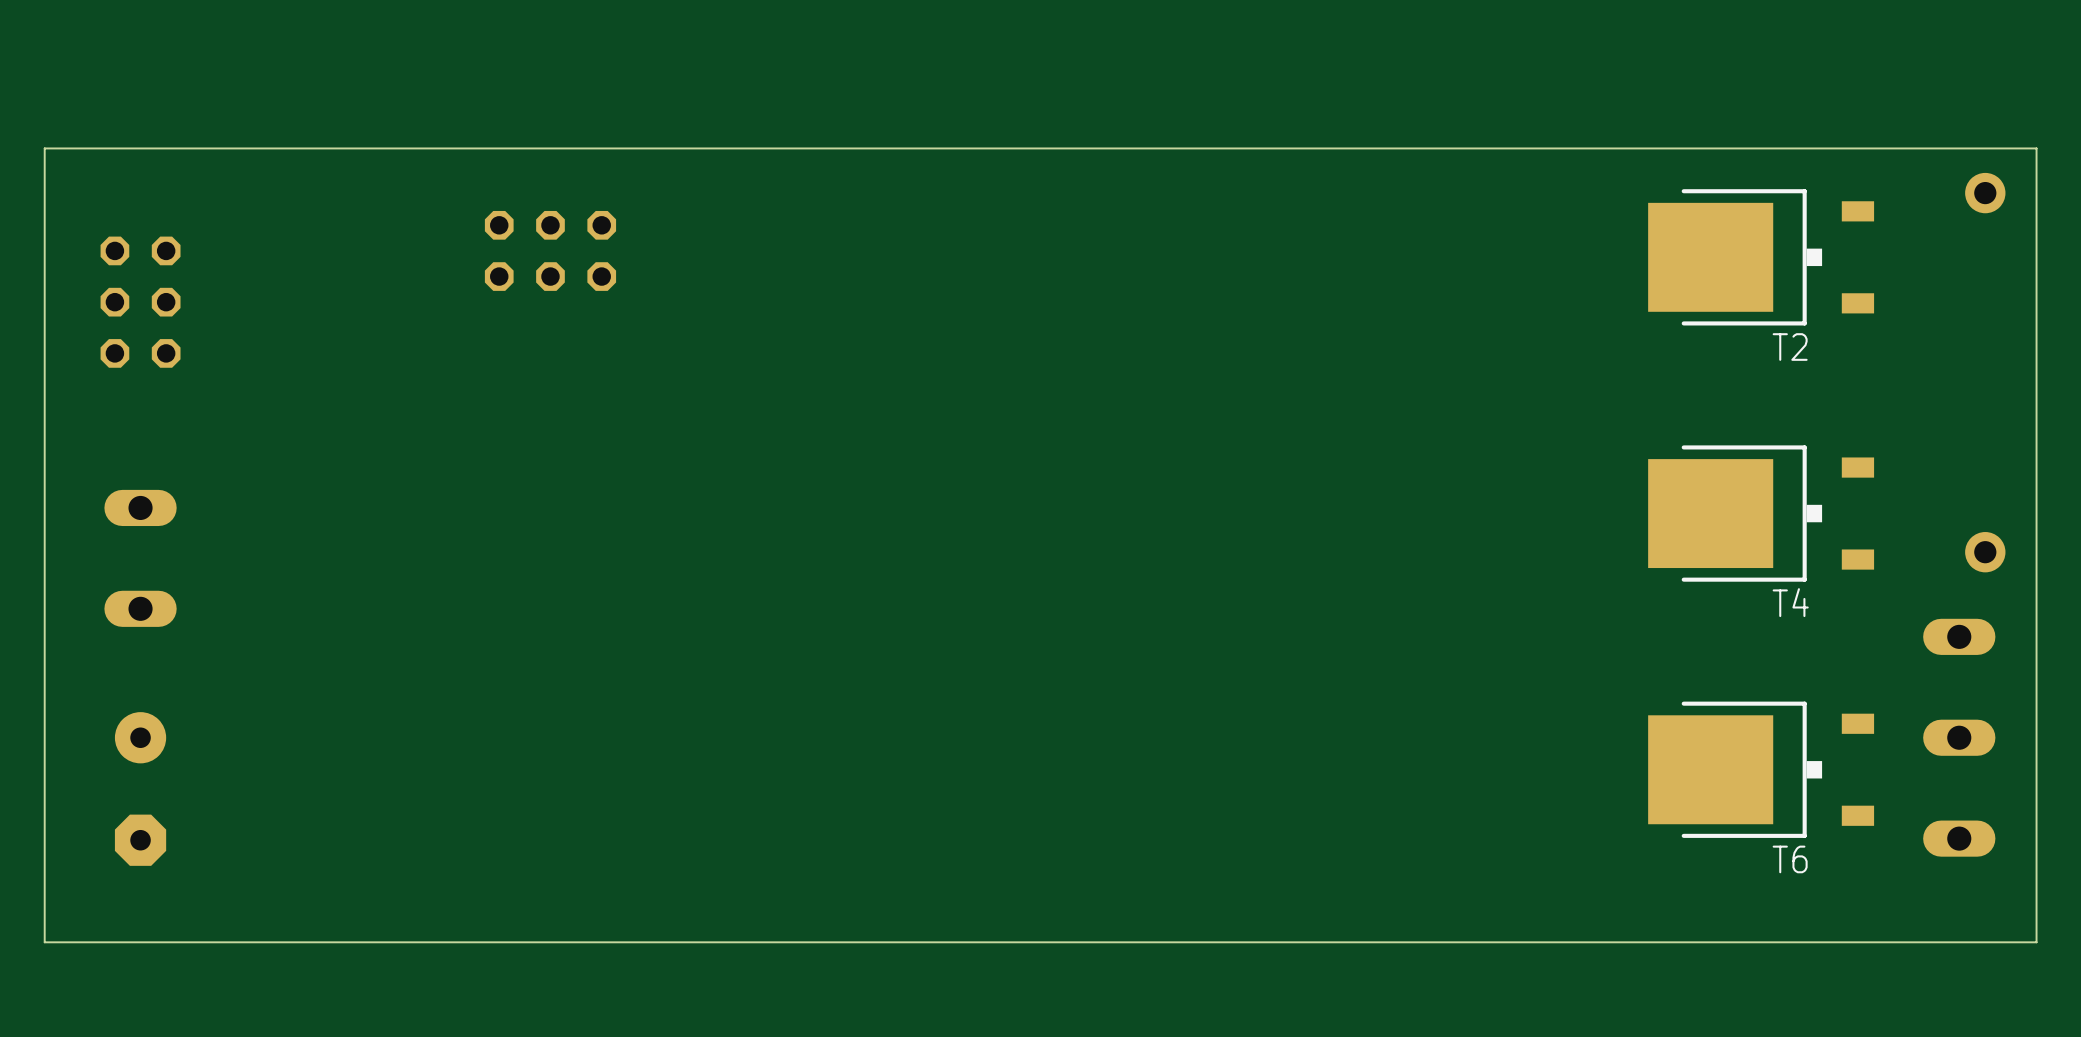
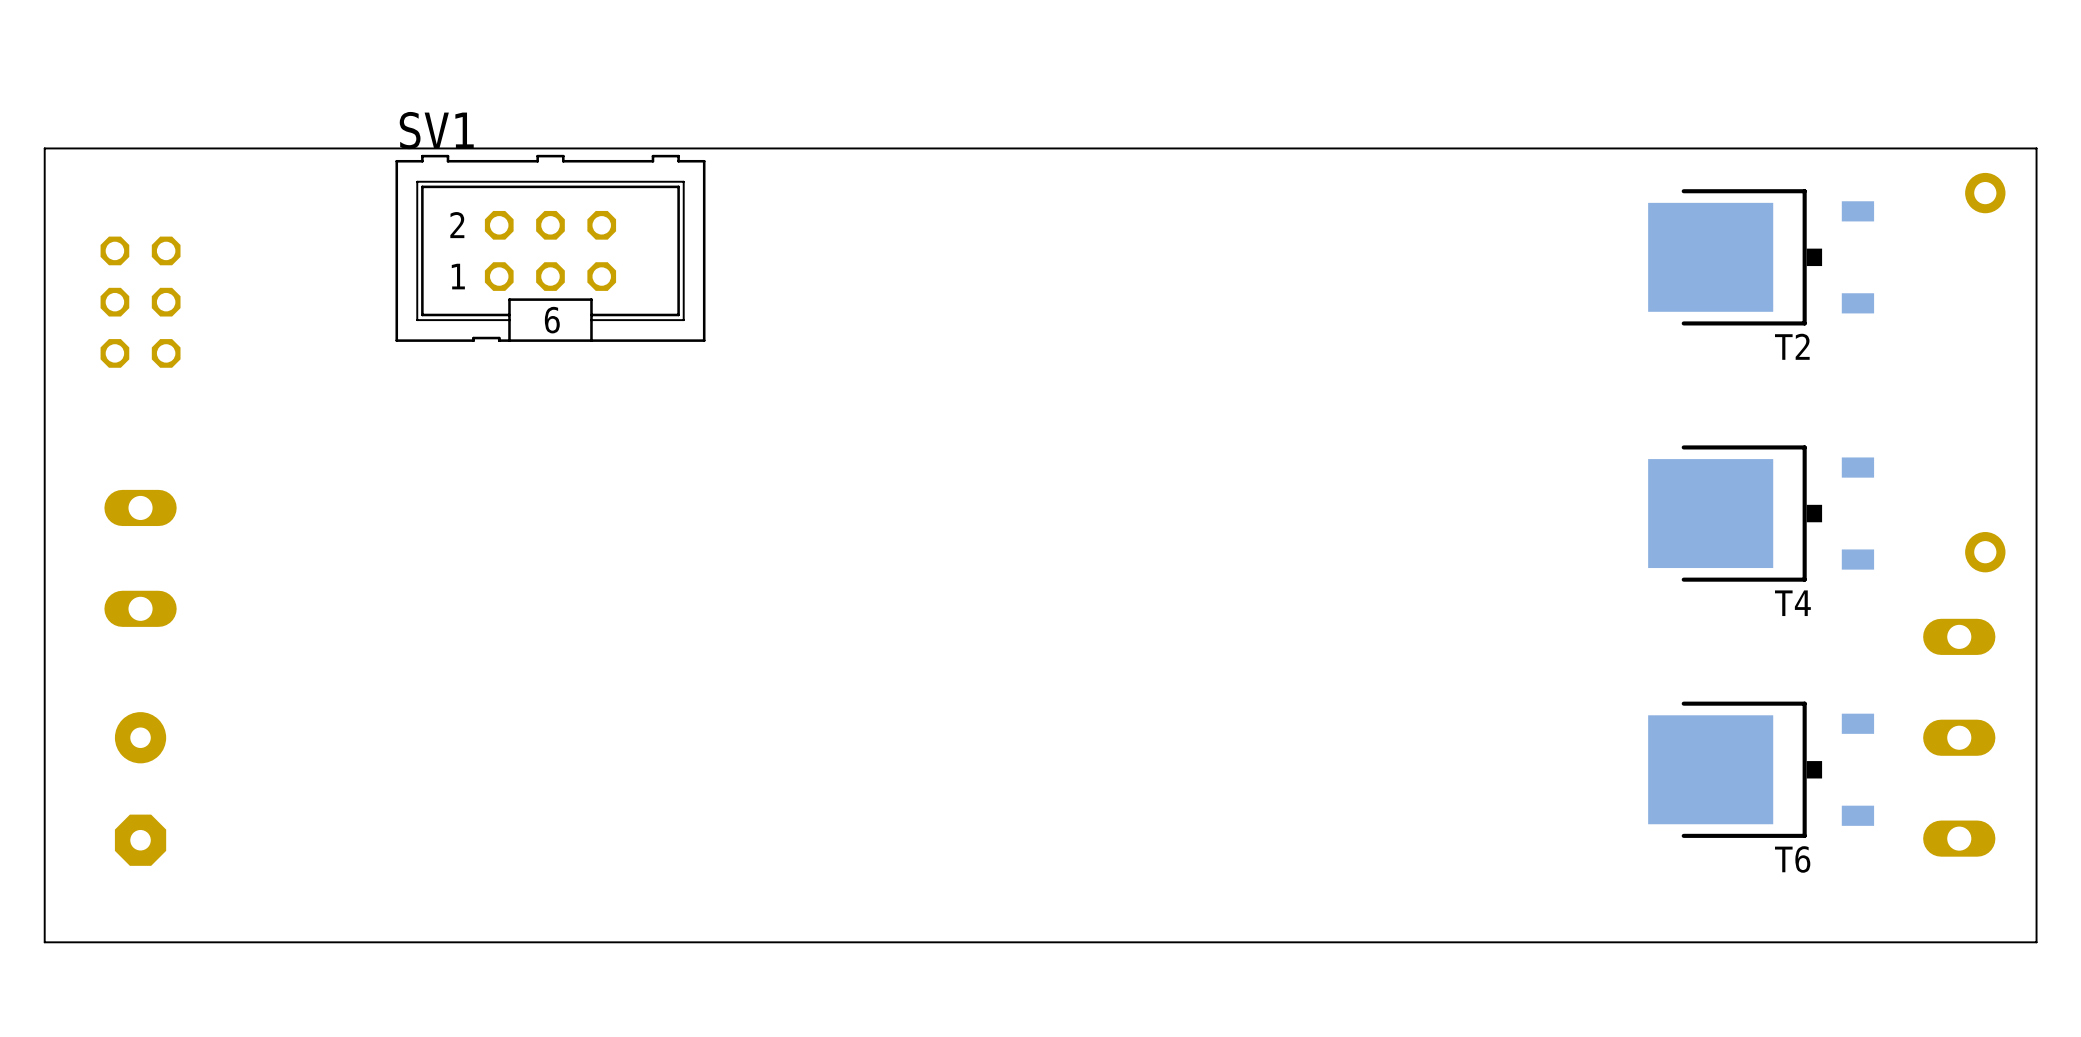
SV1 side: top (550, 250) -> bottom (550, 248)

